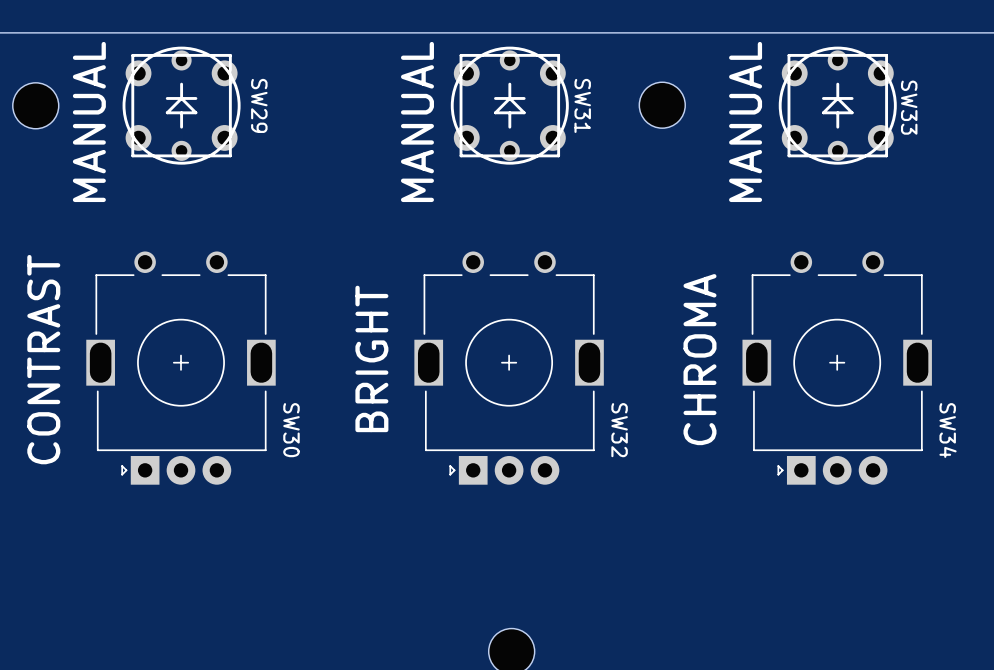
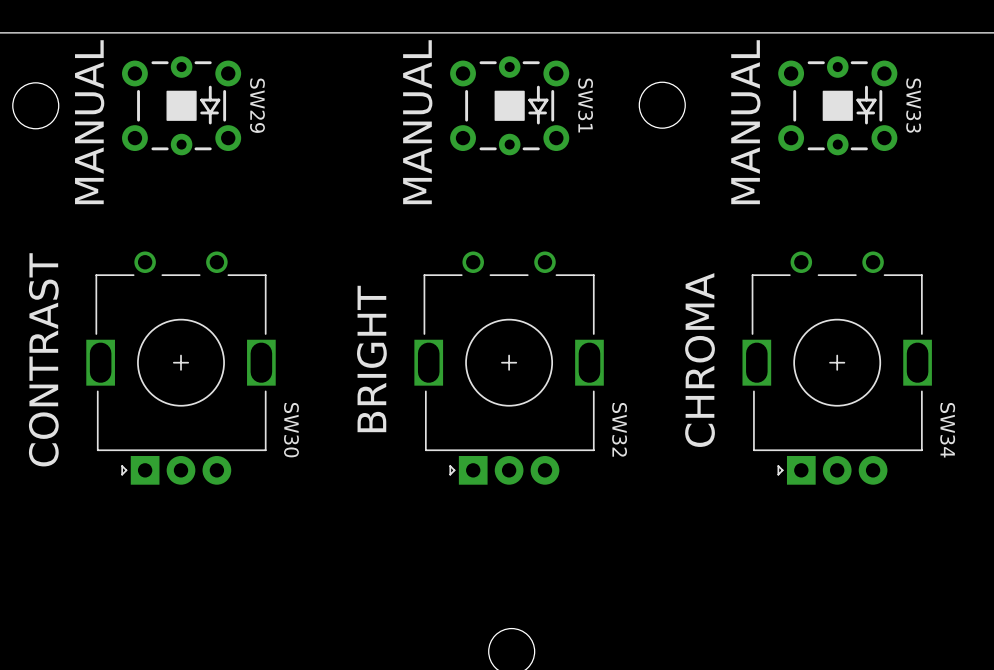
SW29 footprint: [122, 46, 241, 165] -> [122, 56, 242, 156]
SW31 footprint: [450, 46, 569, 165] -> [450, 56, 570, 156]
SW33 footprint: [778, 46, 897, 165] -> [778, 56, 898, 156]

